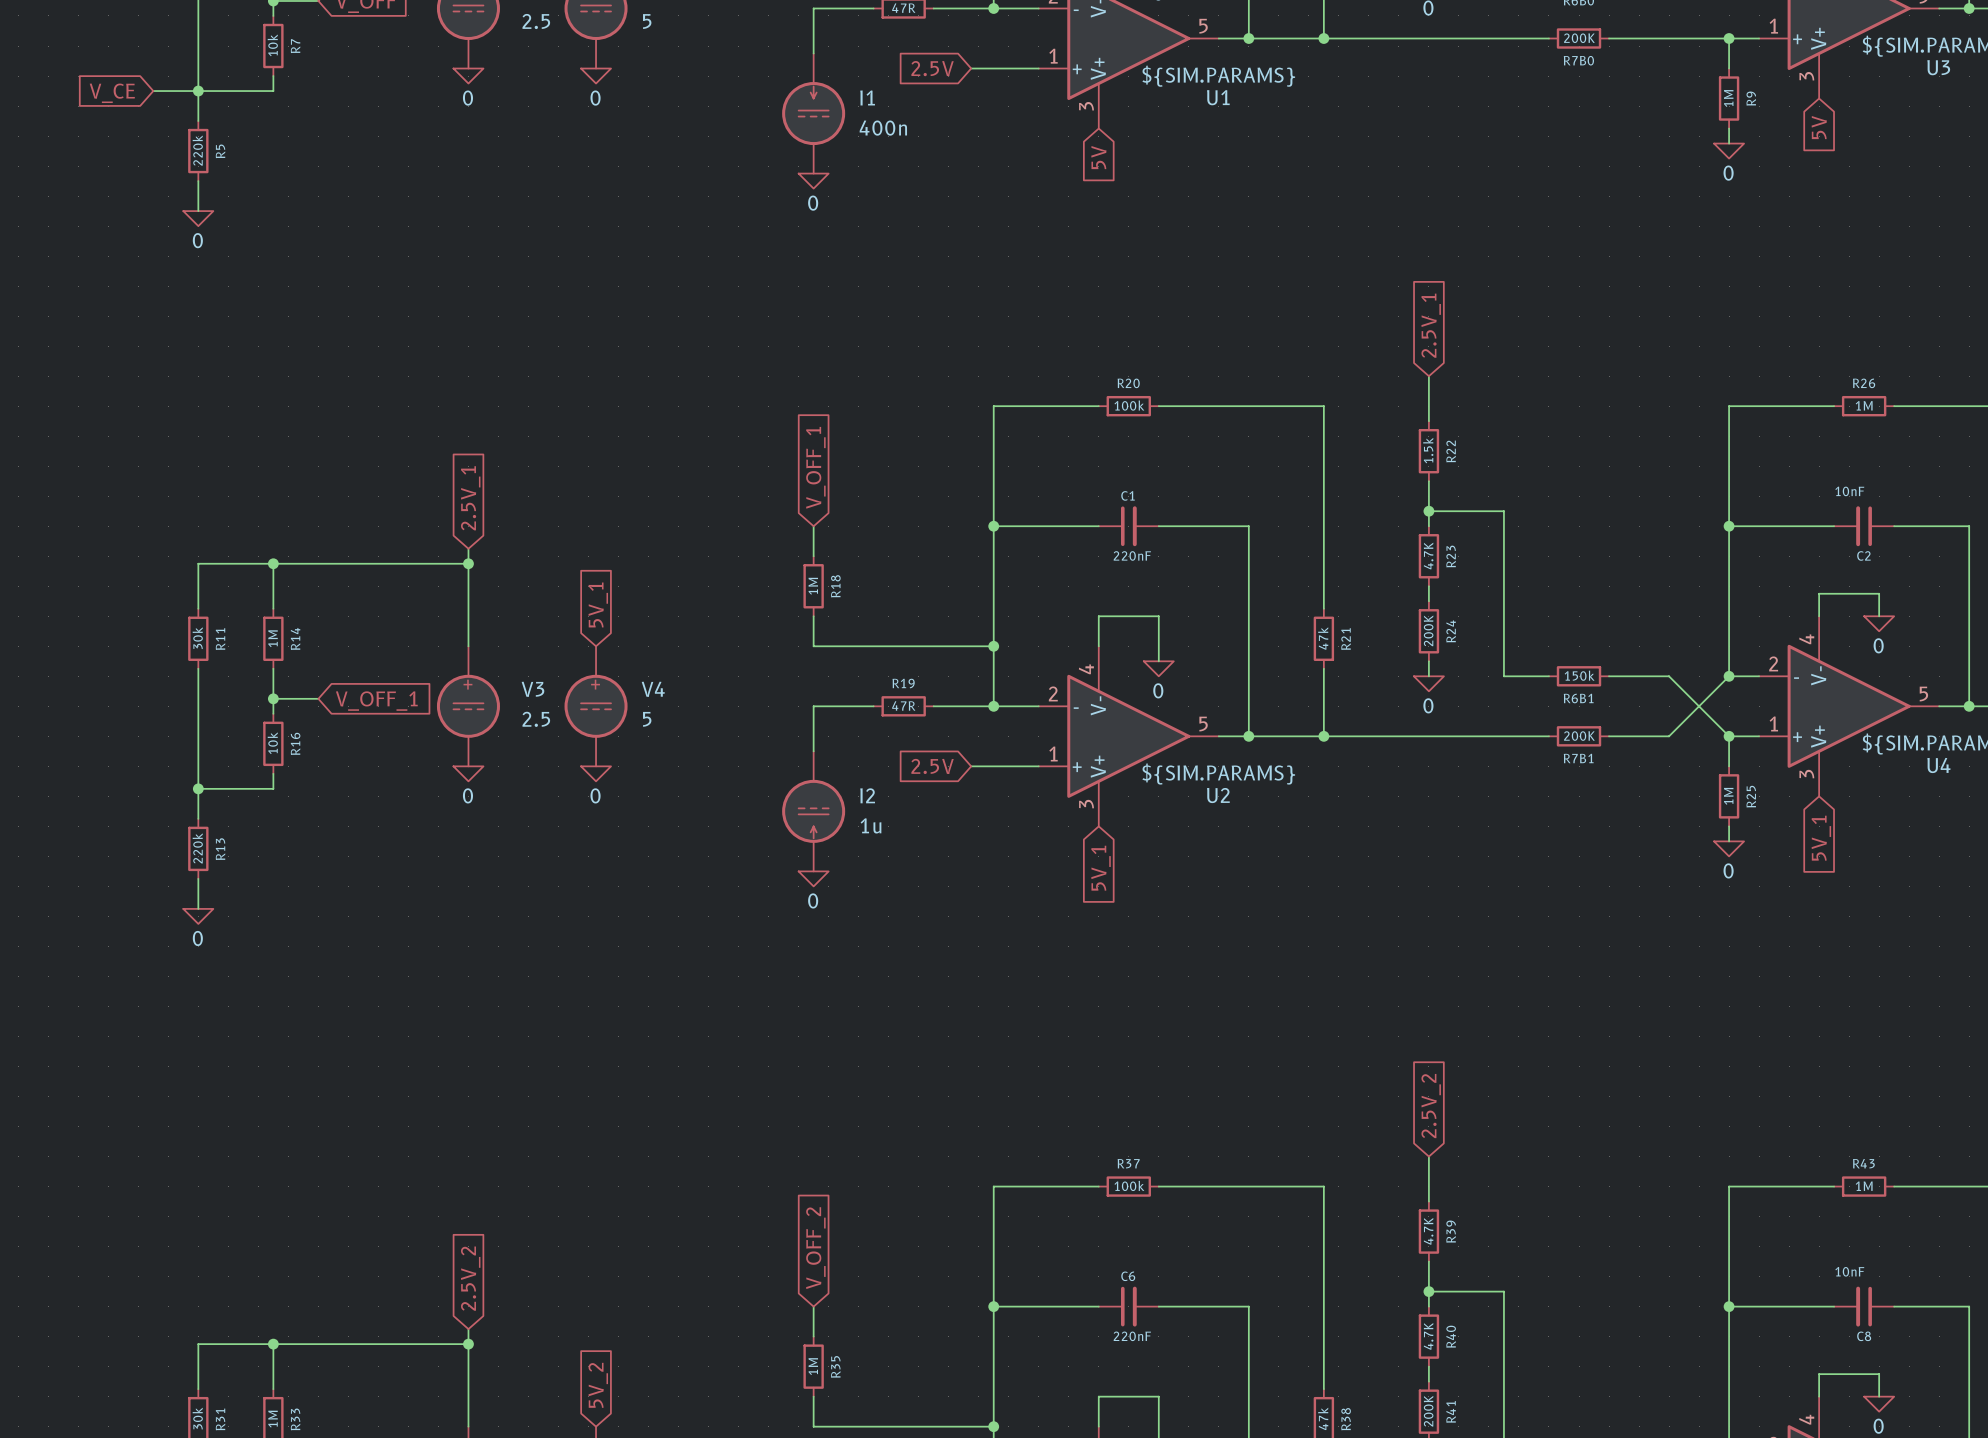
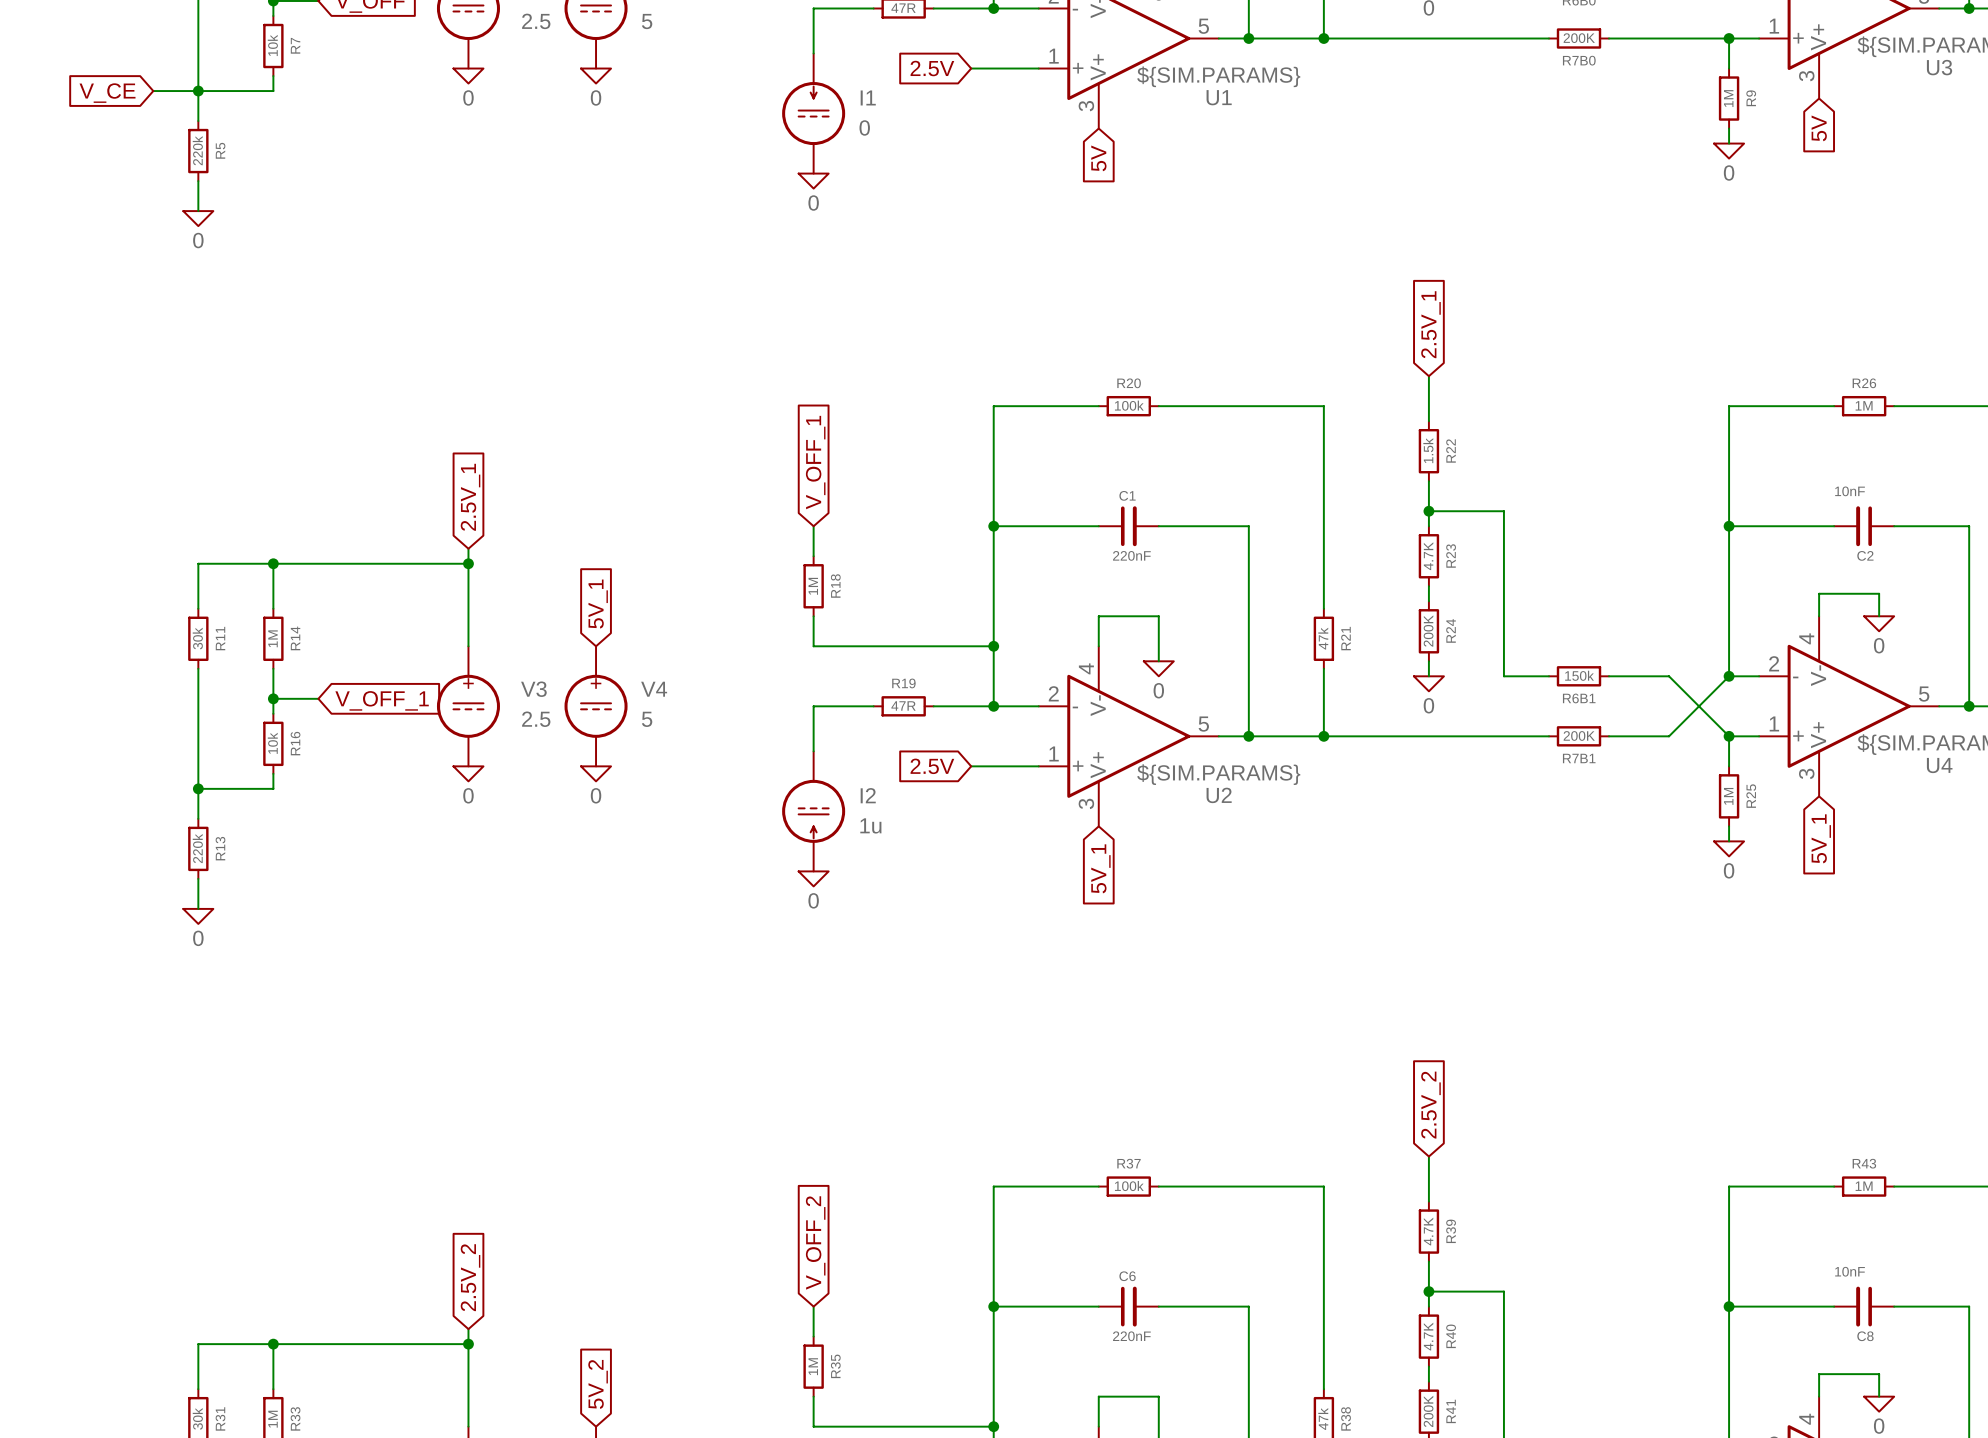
I1 value: 400n (883, 128) -> 0 (864, 127)

